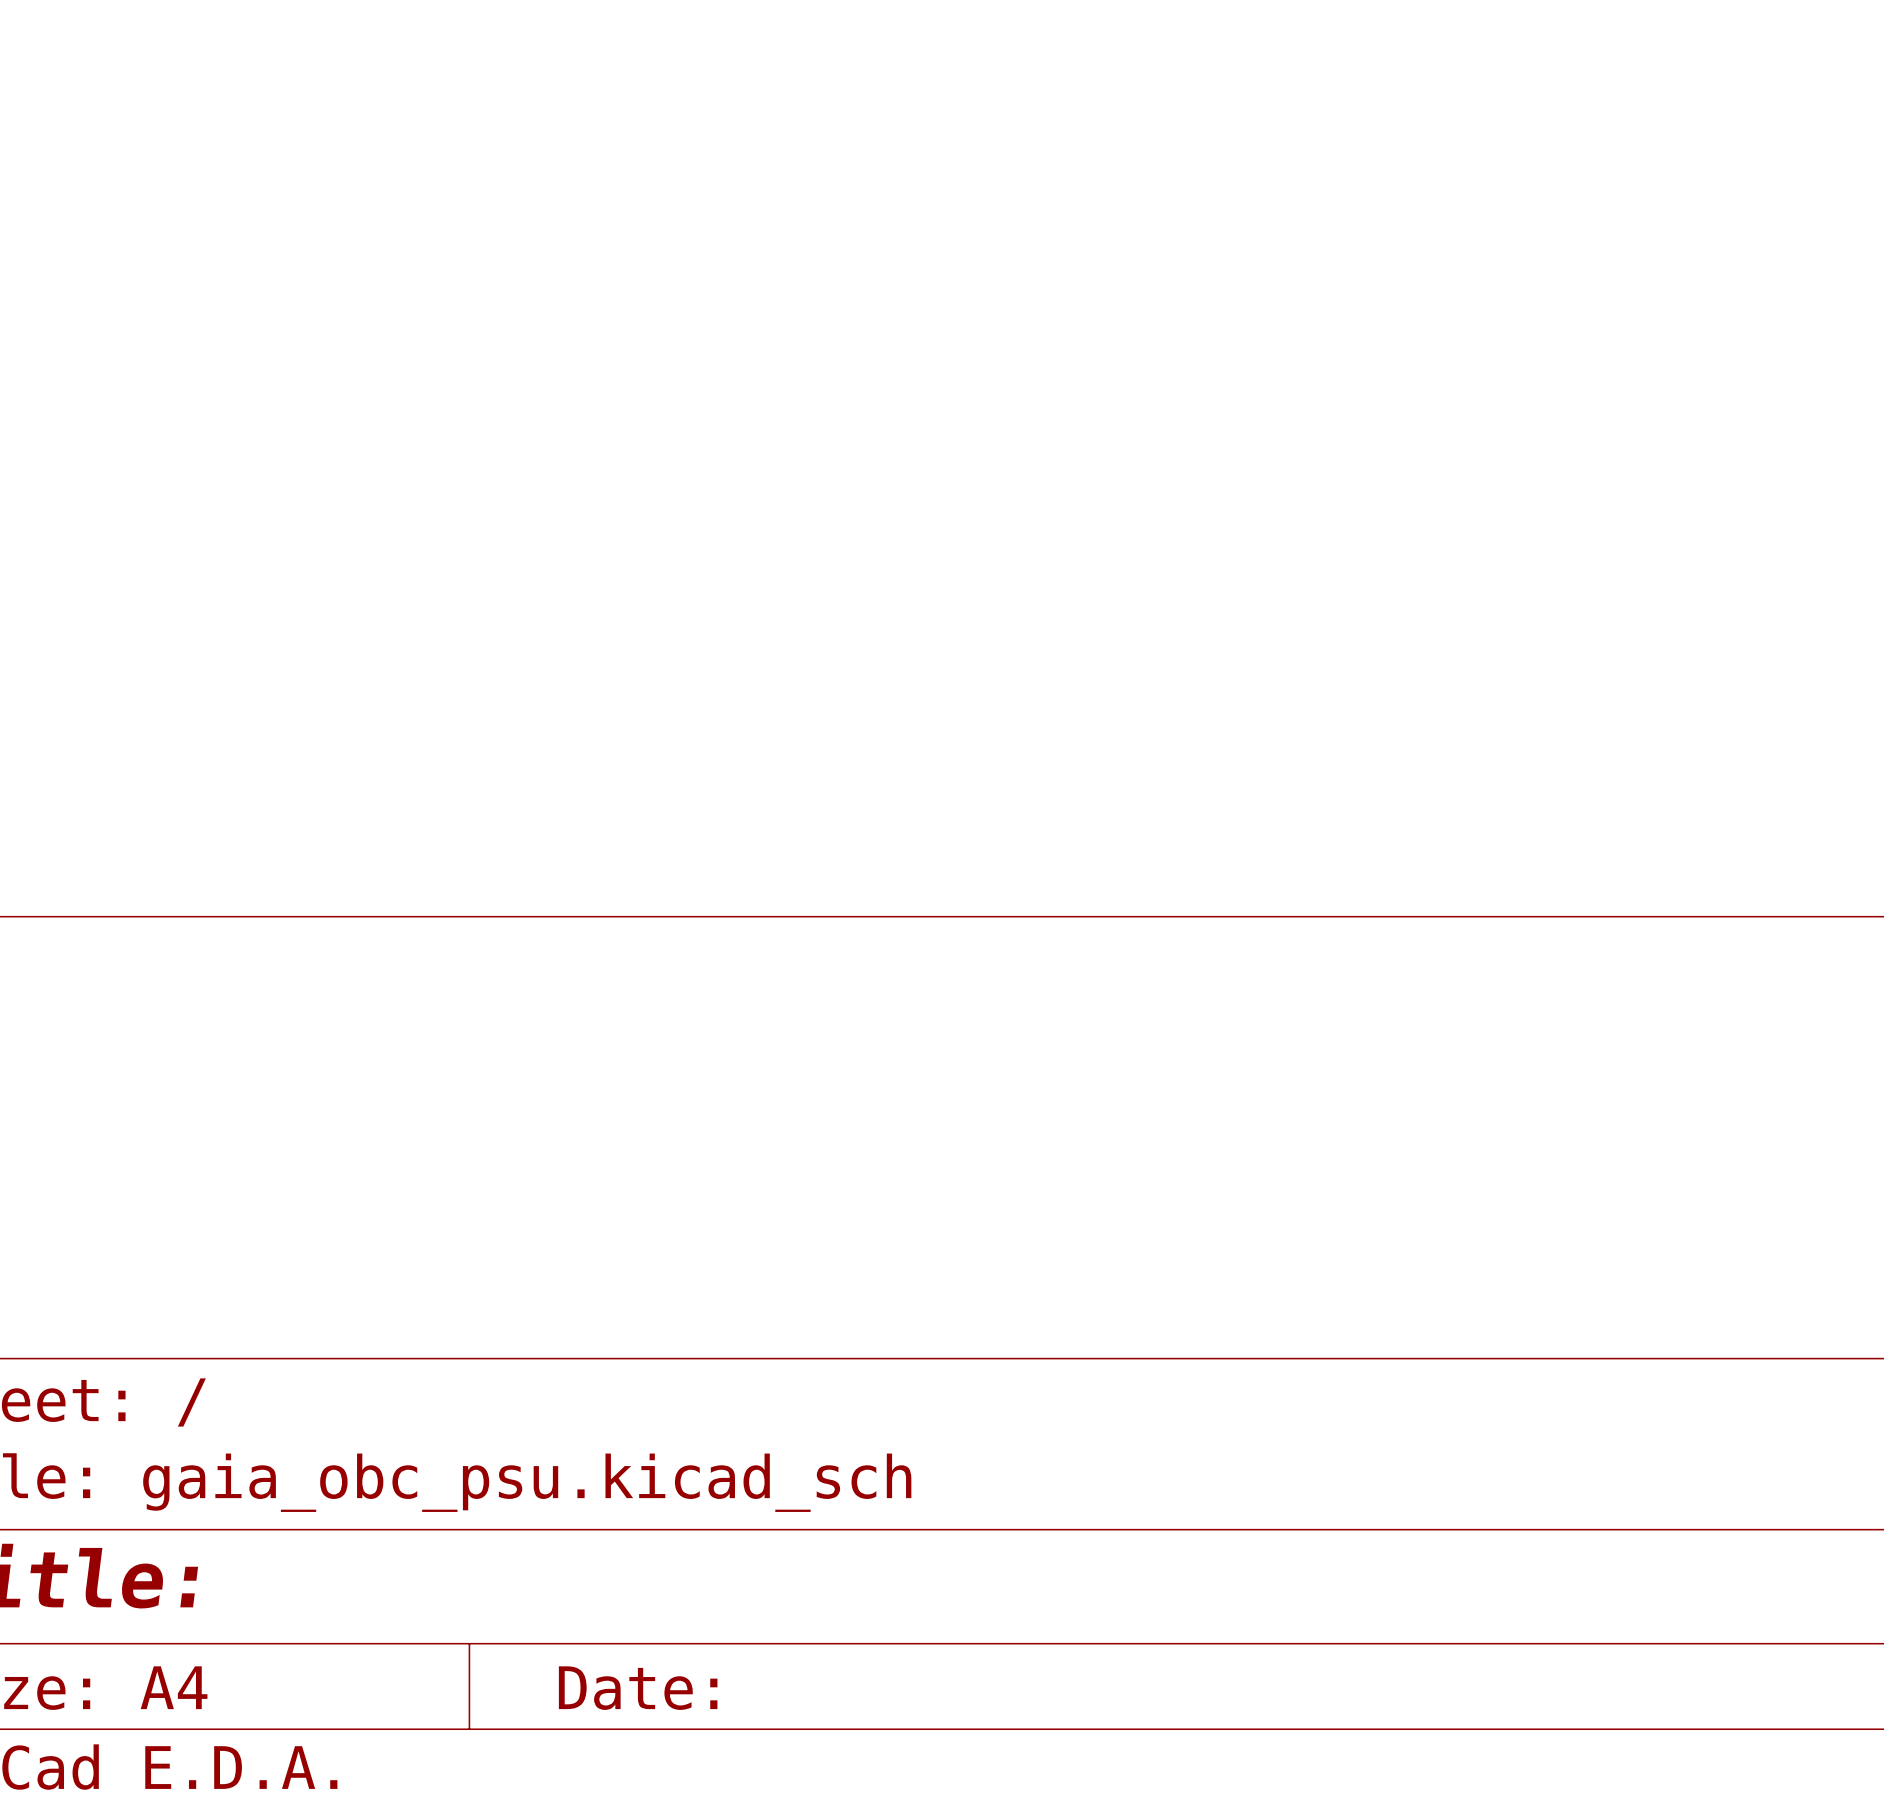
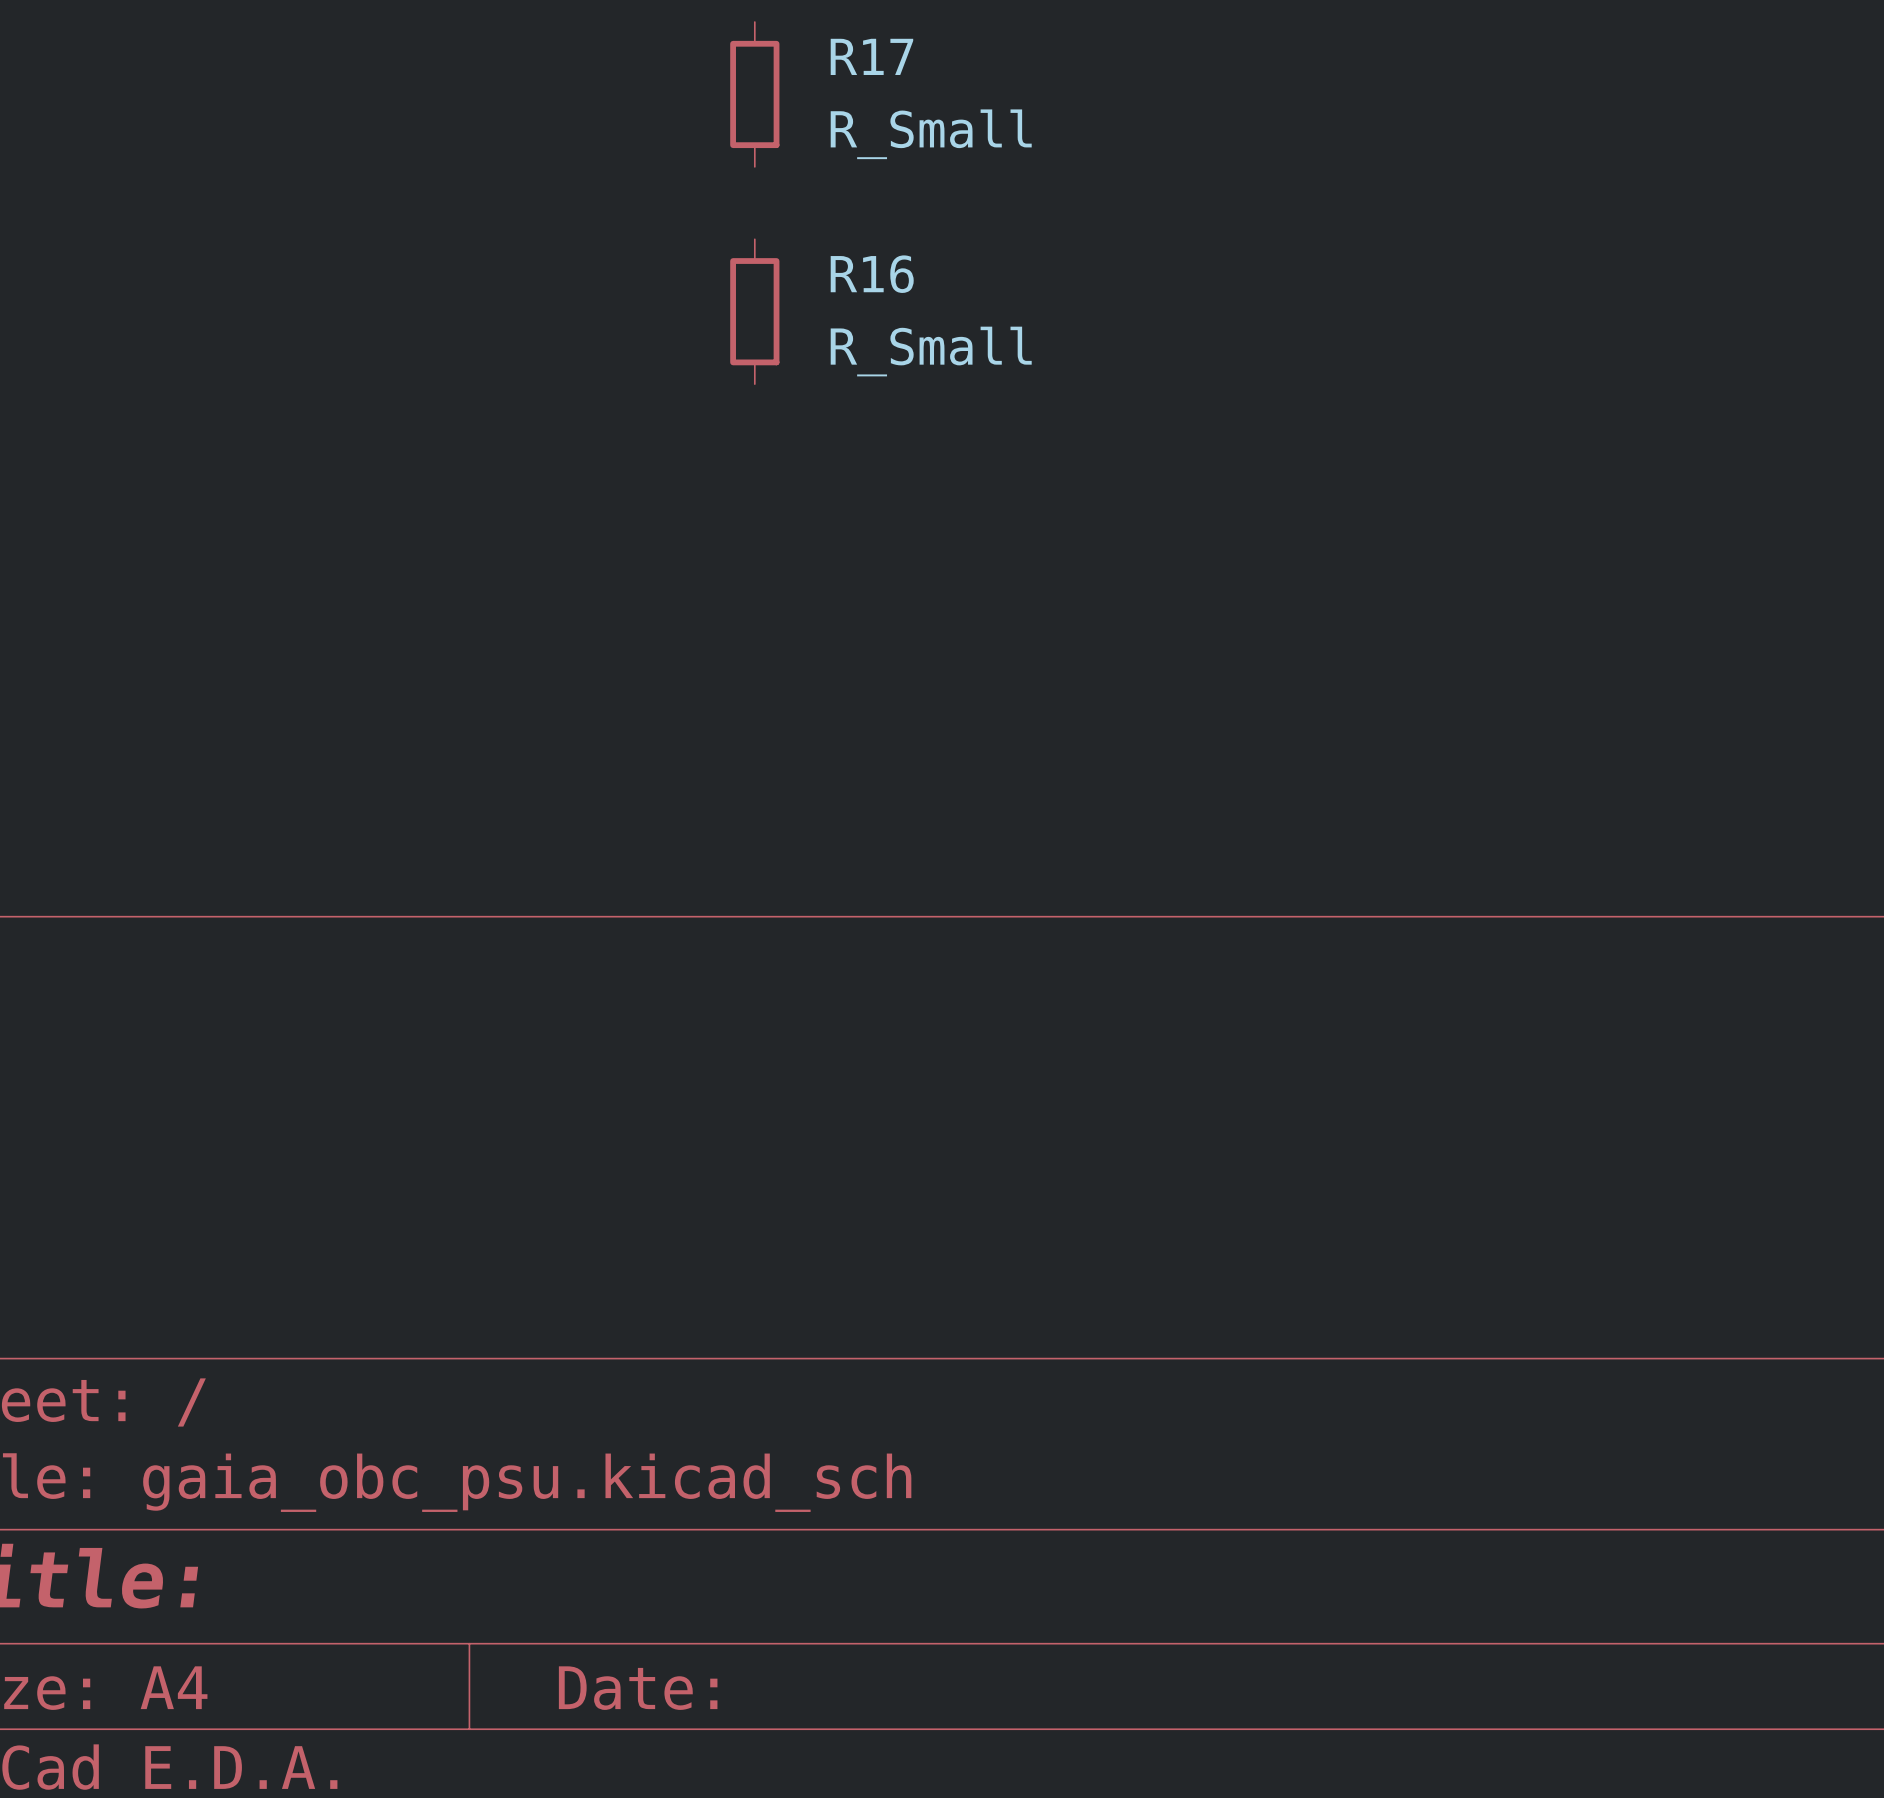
R17: none -> R_Small (754, 94)
R16: none -> R_Small (754, 311)

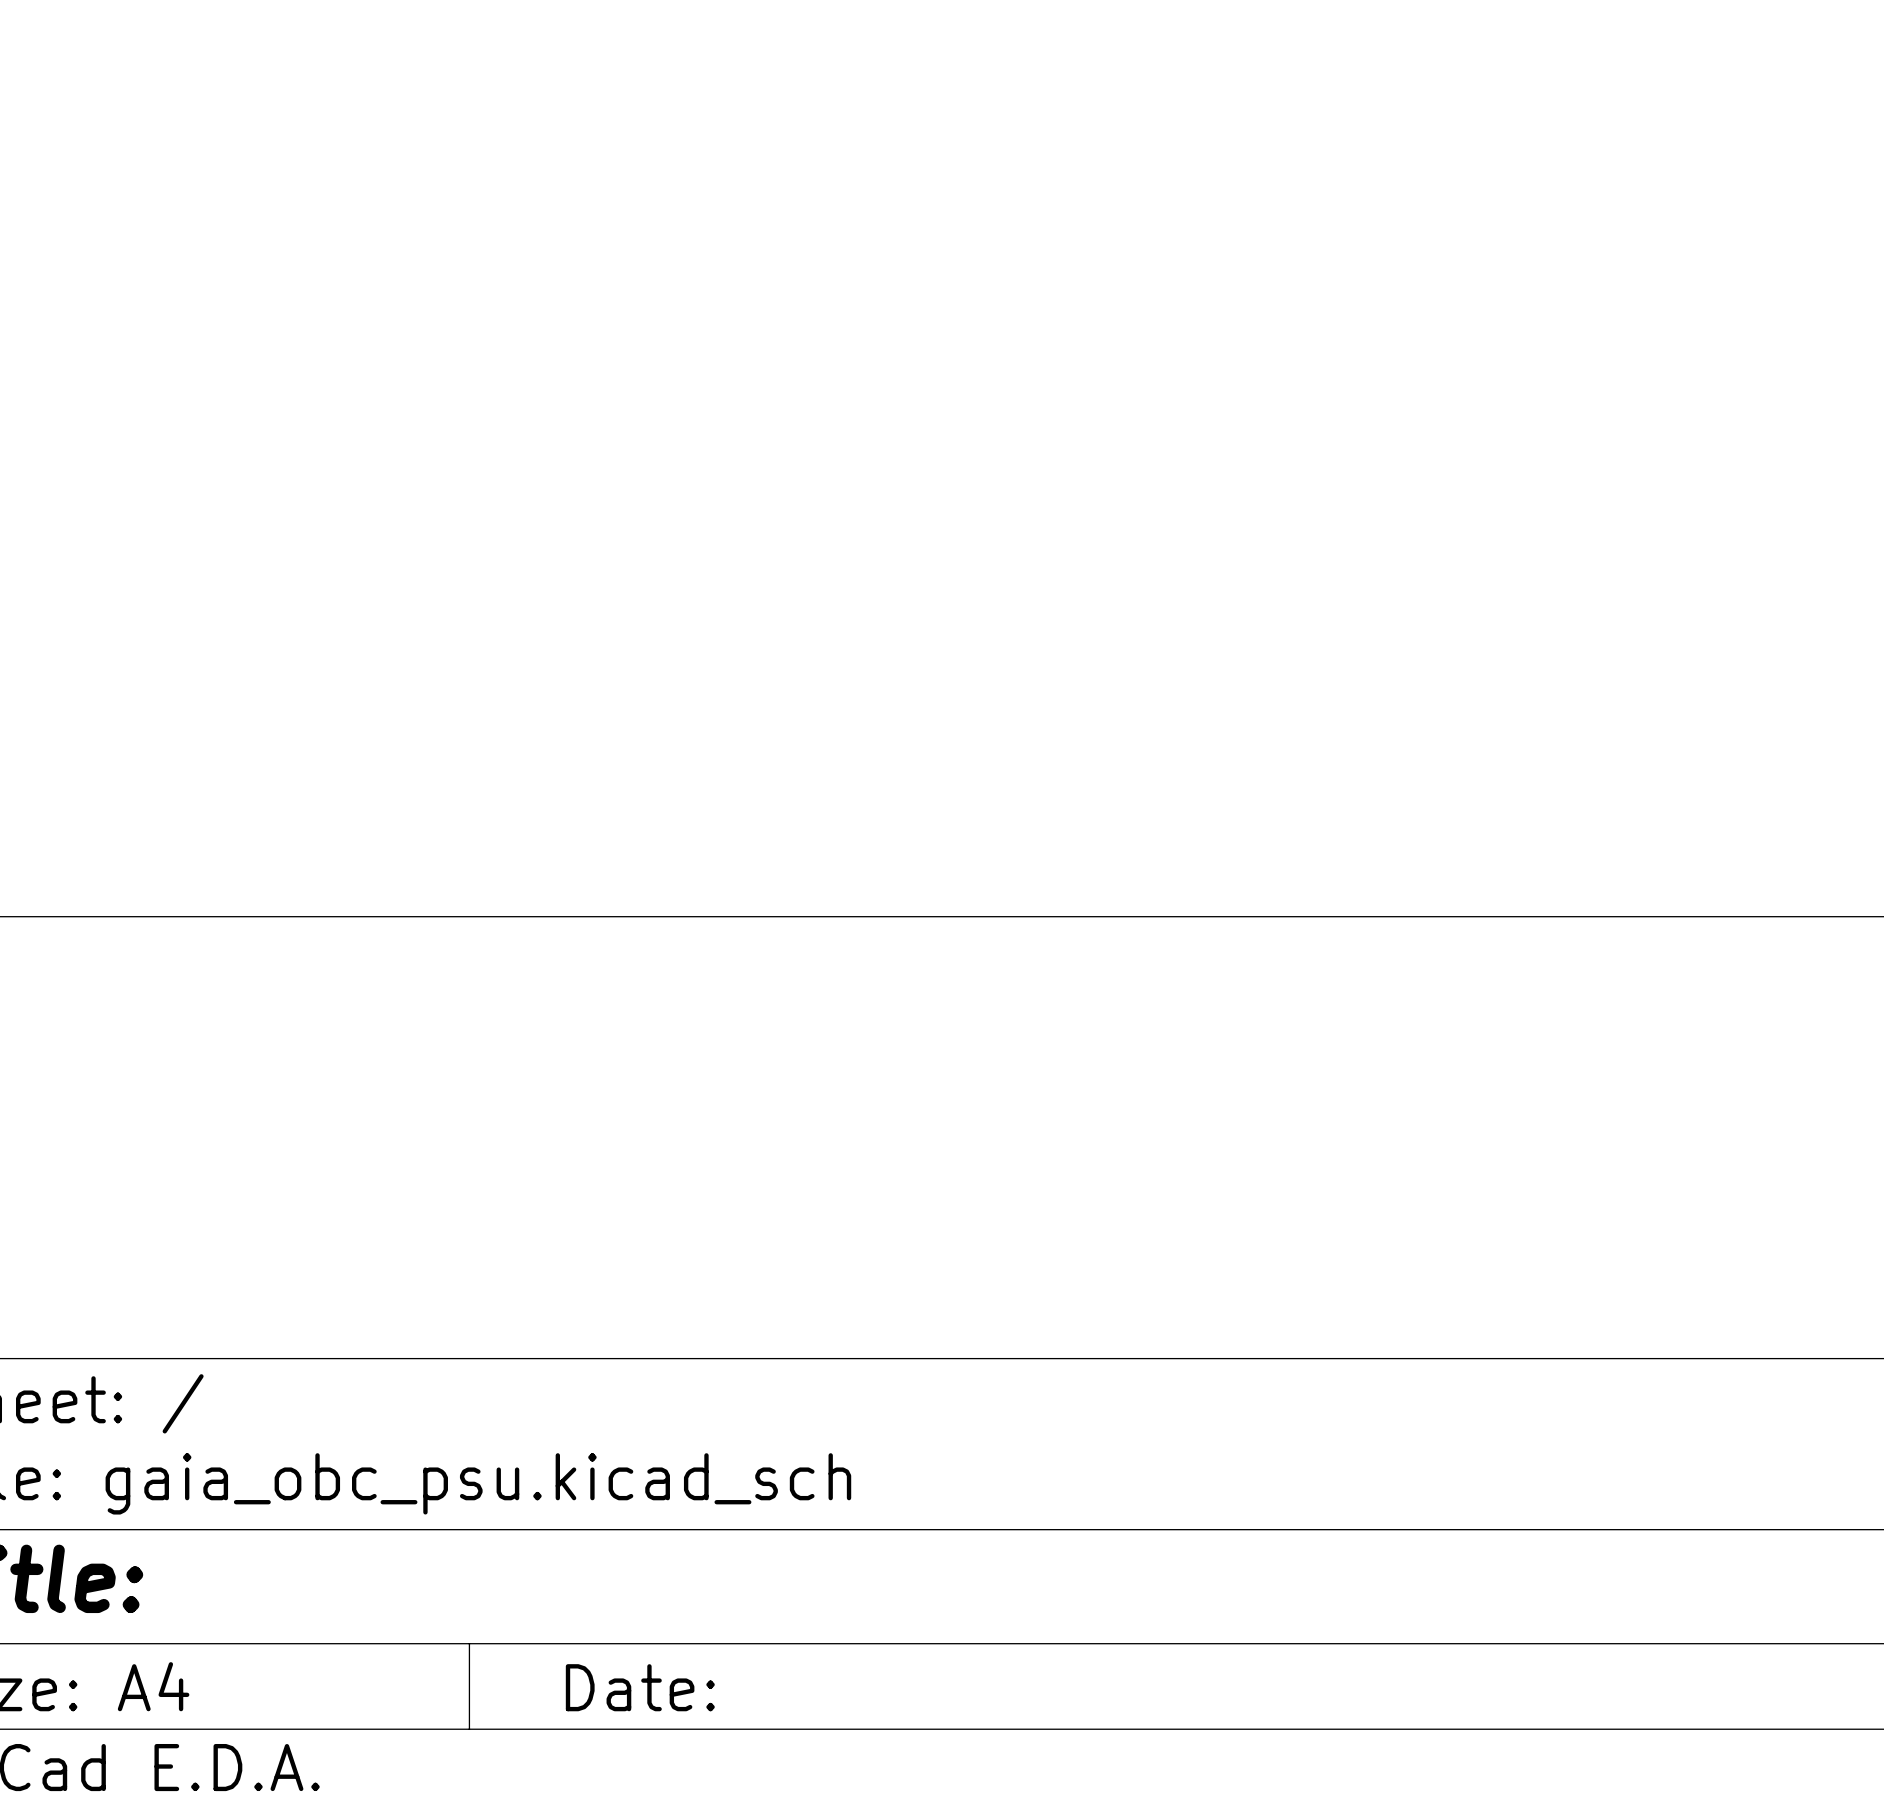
R17: R_Small (754, 94) -> none
R16: R_Small (754, 311) -> none

